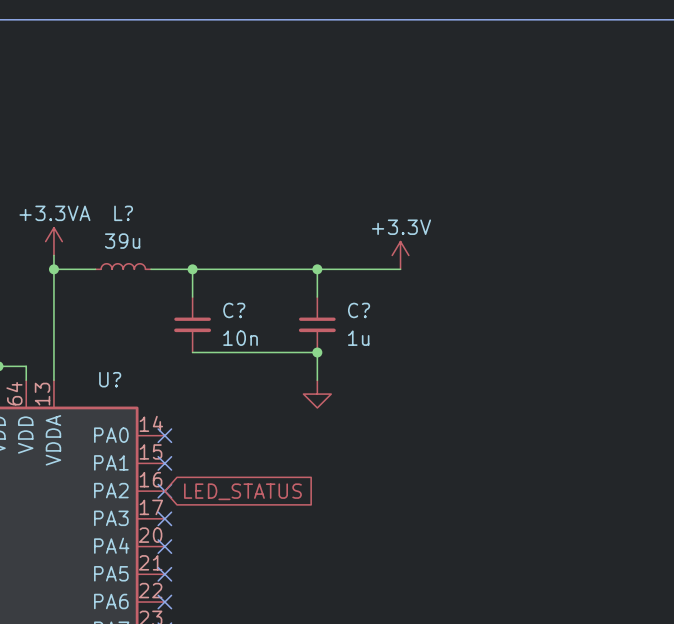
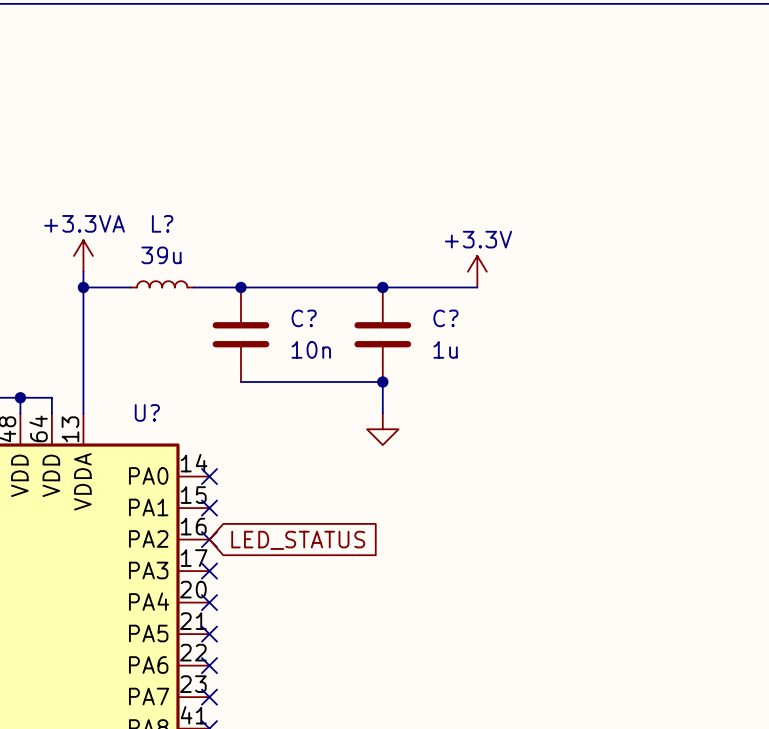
C?: none -> 10n (241, 334)
C?: none -> 1u (382, 334)
C?: 10n (192, 324) -> none
C?: 1u (317, 324) -> none

